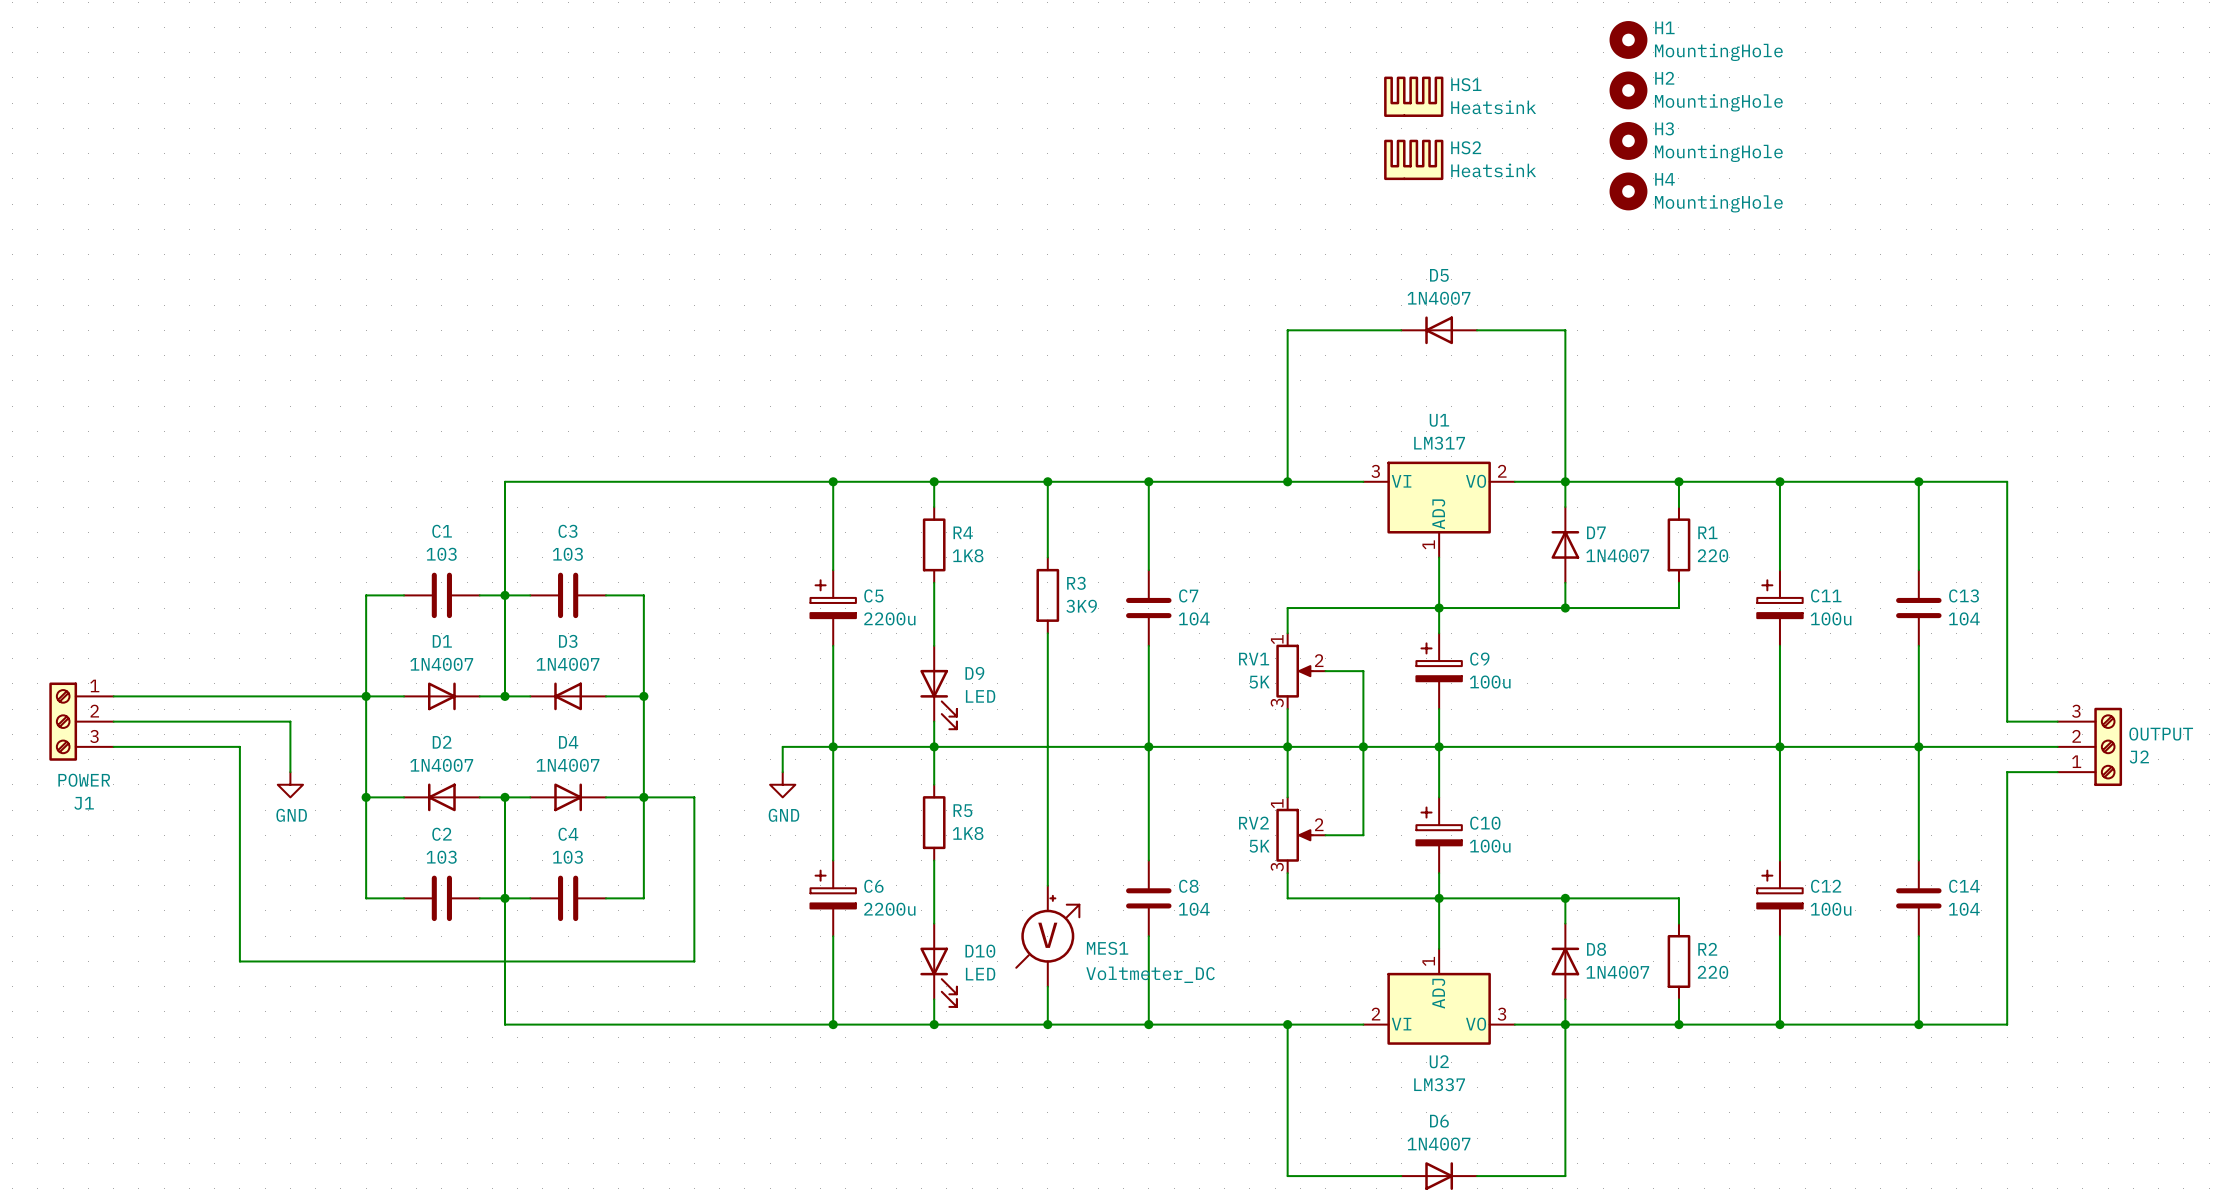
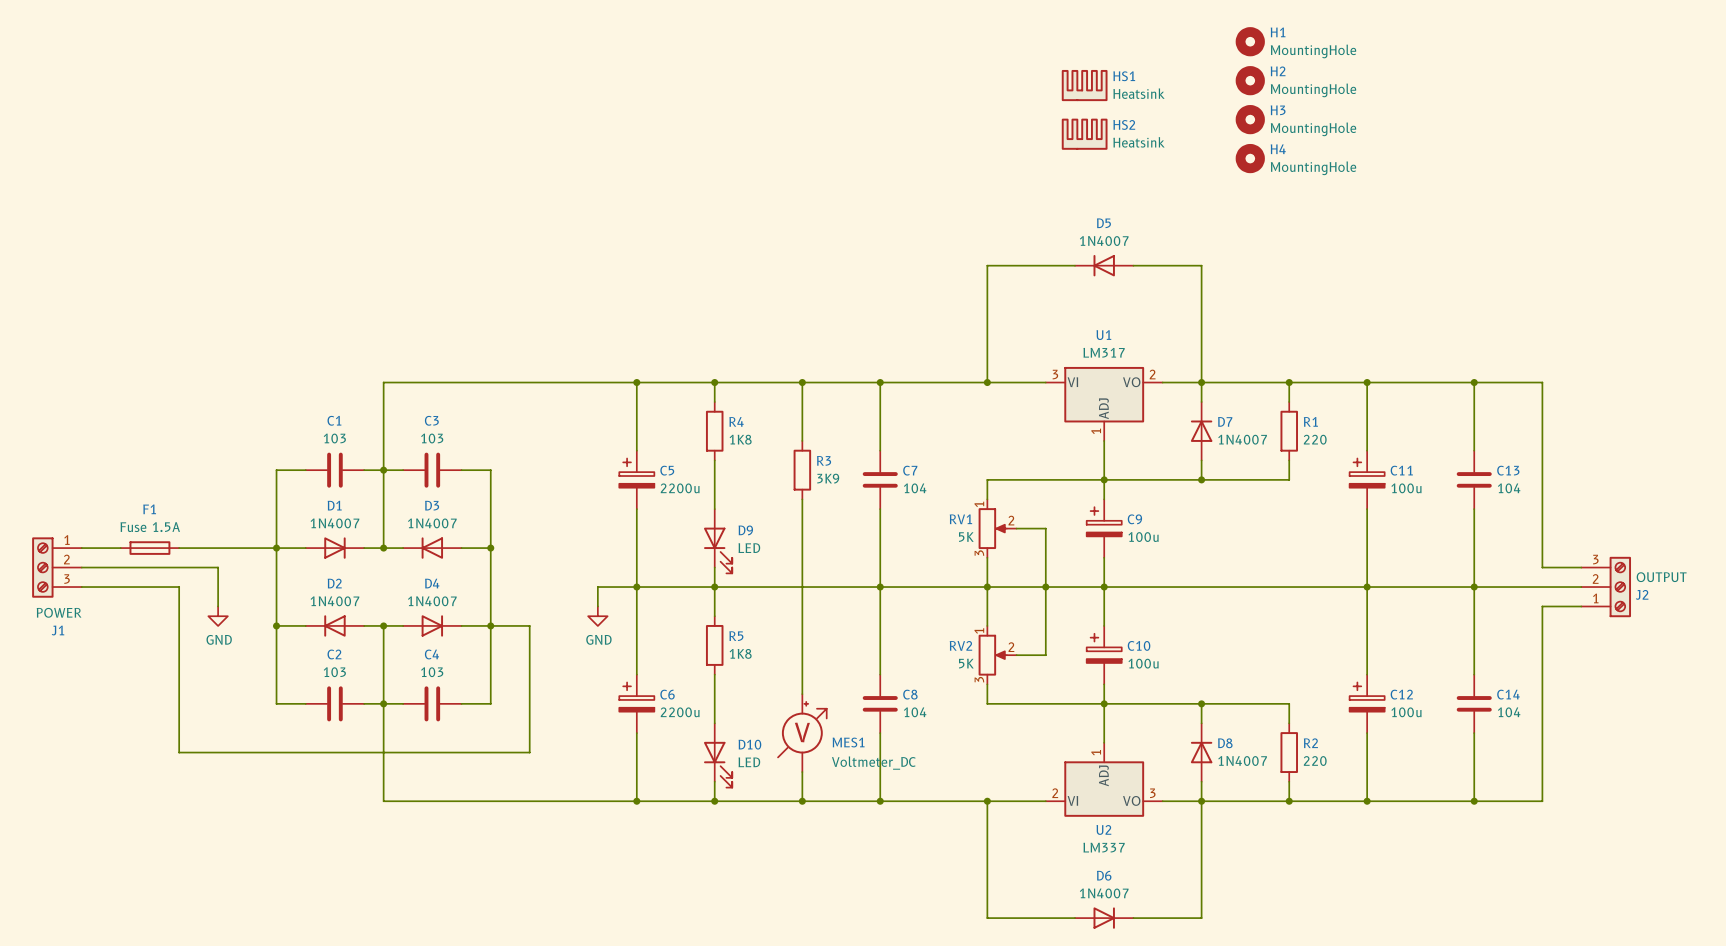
F1: none -> Fuse 1.5A (149, 548)

